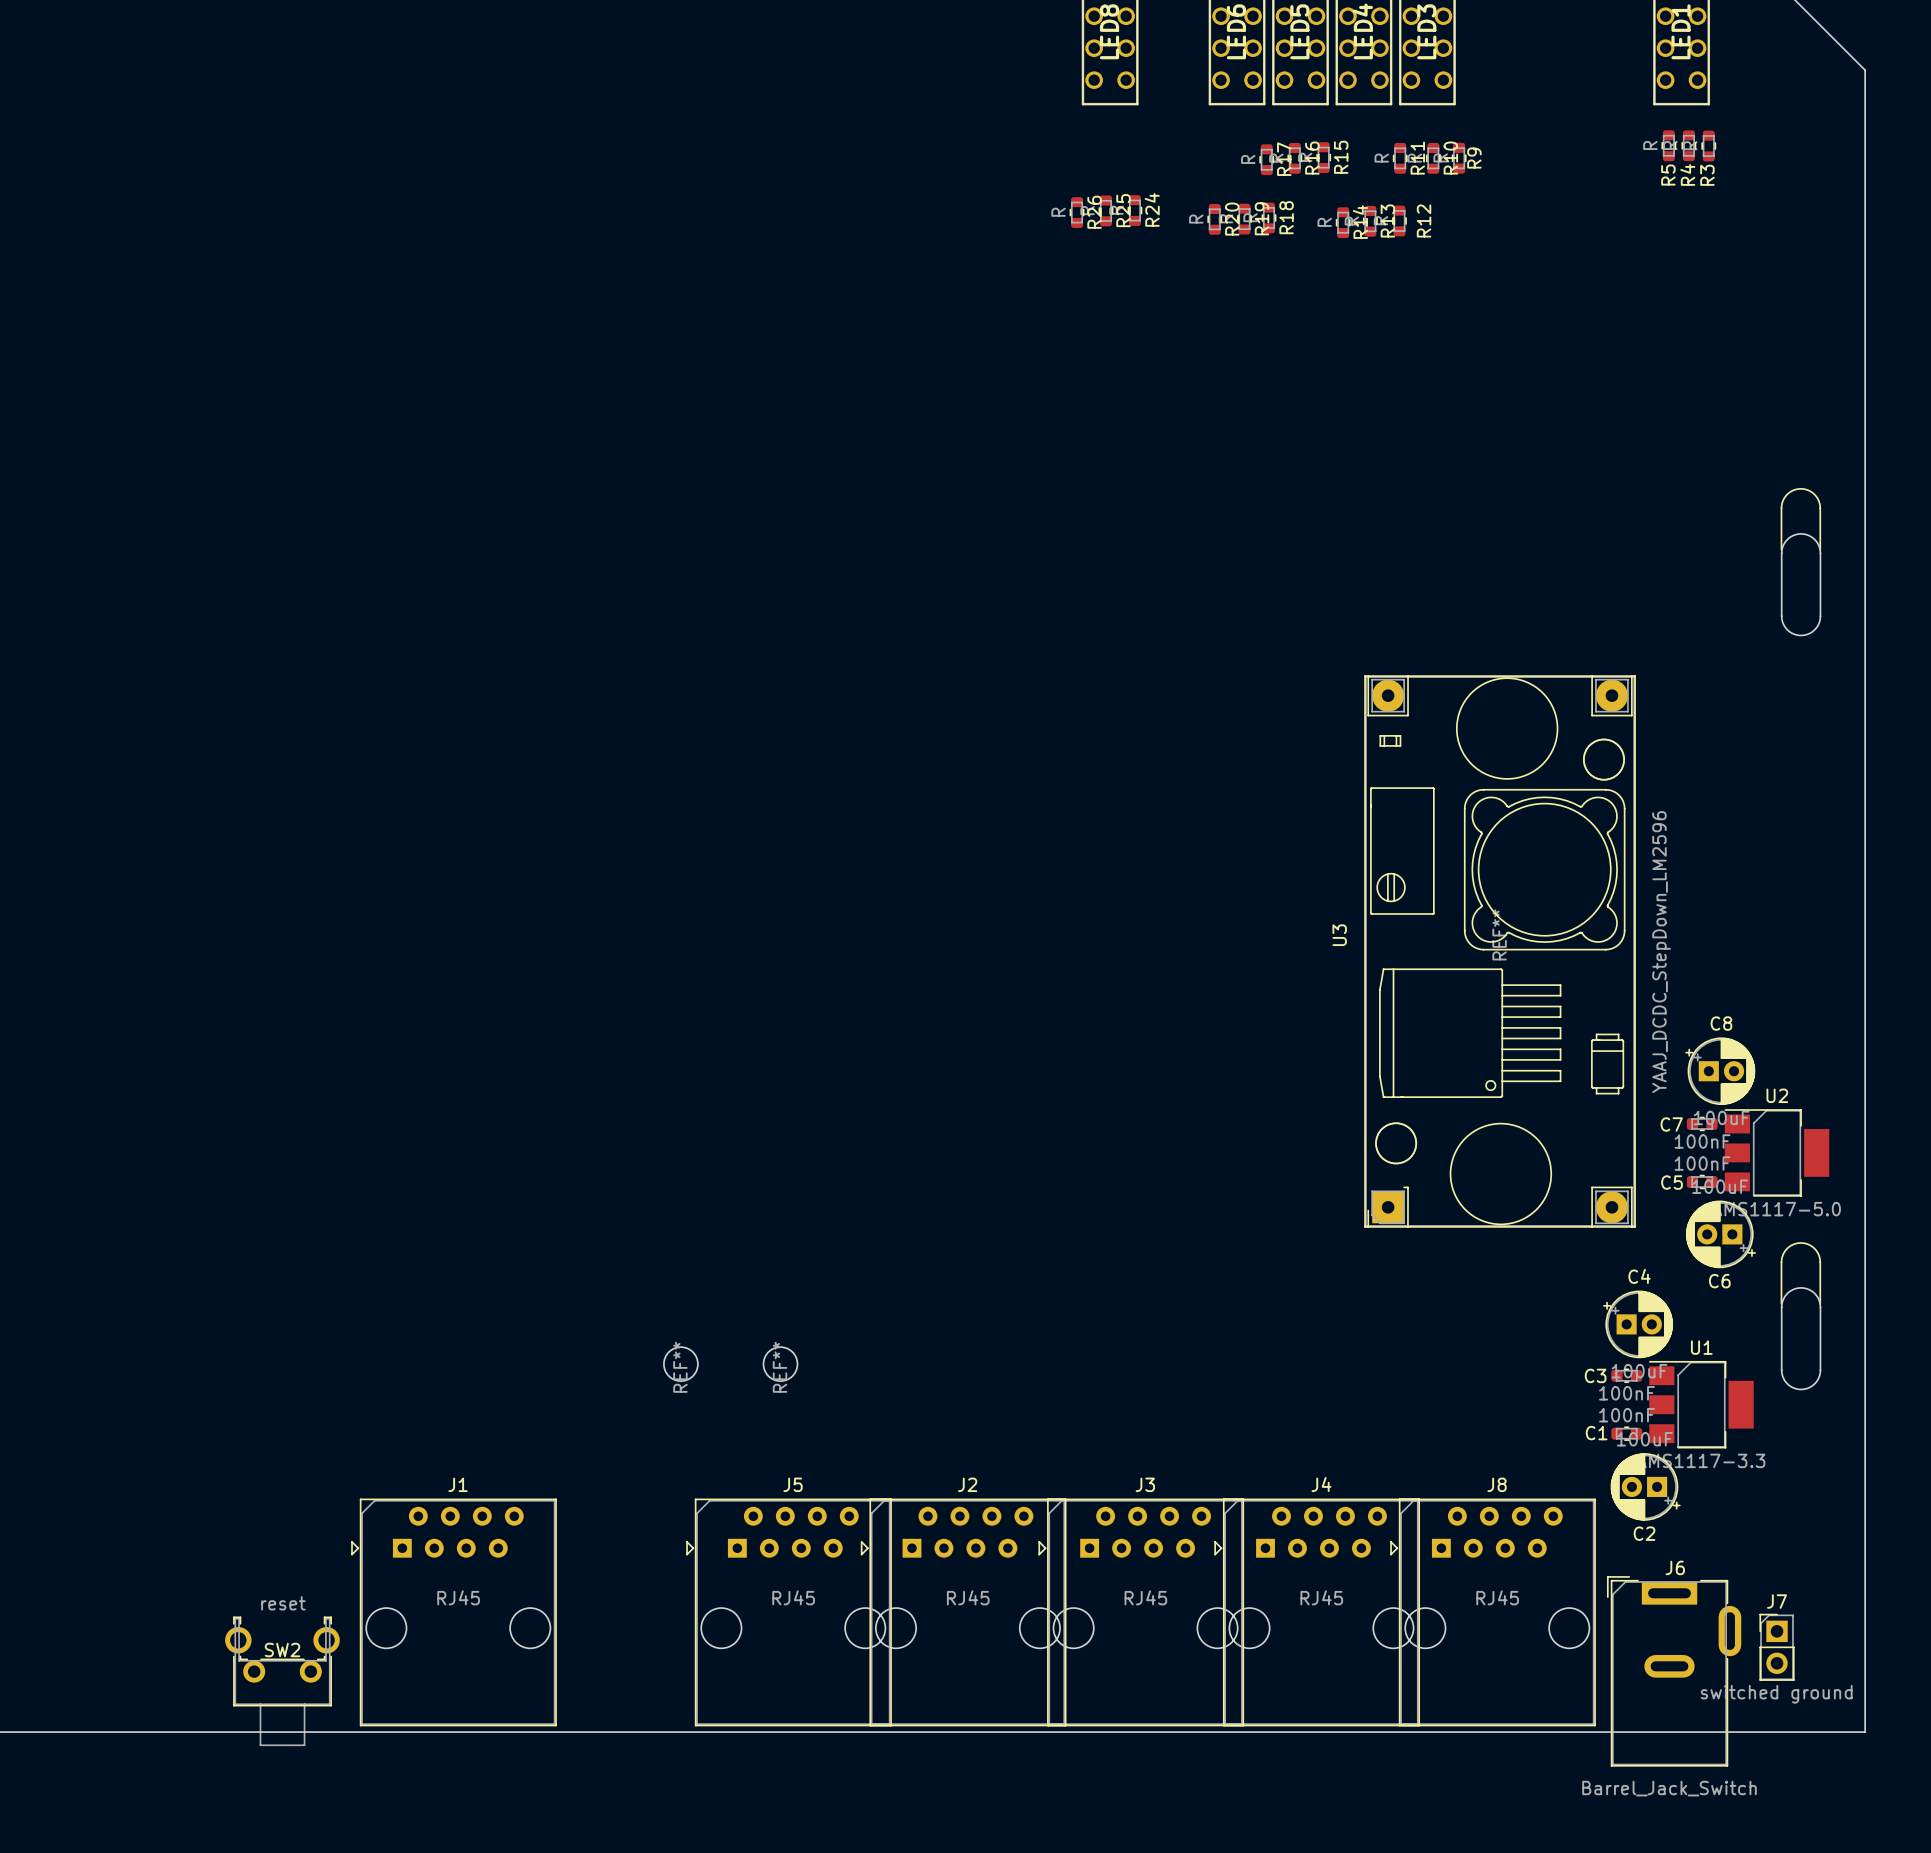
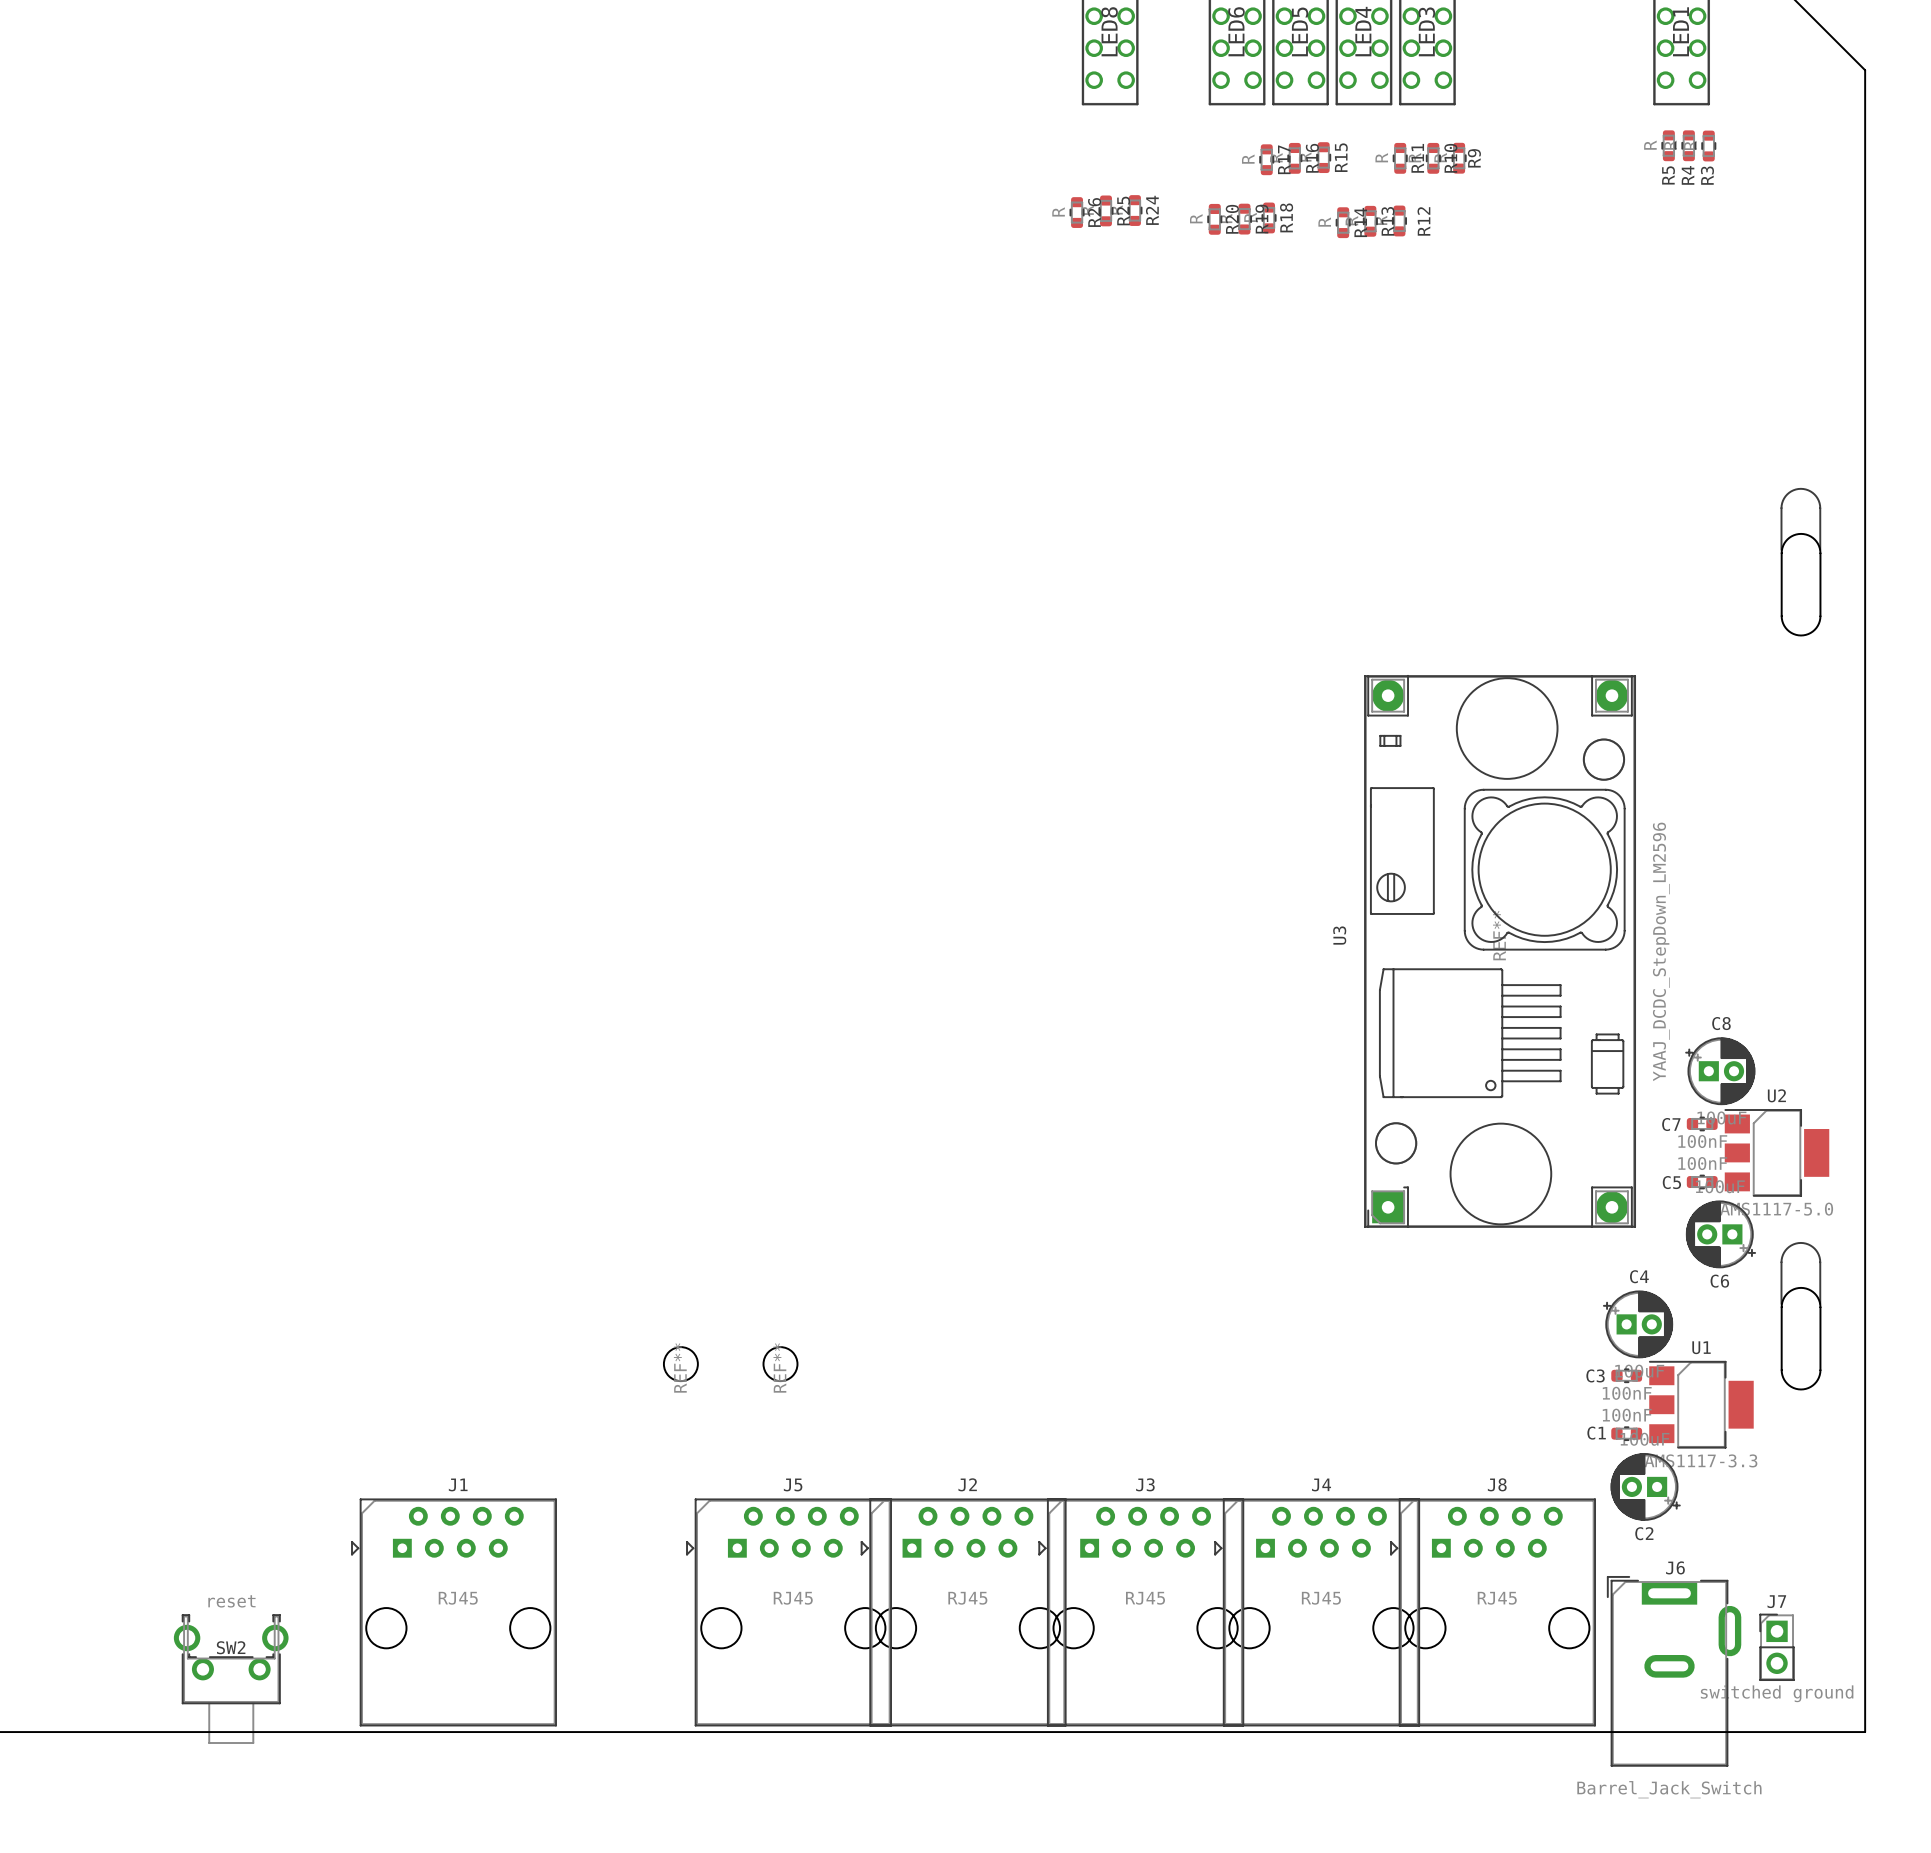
SW2 position: (282, 1681) -> (231, 1678)

